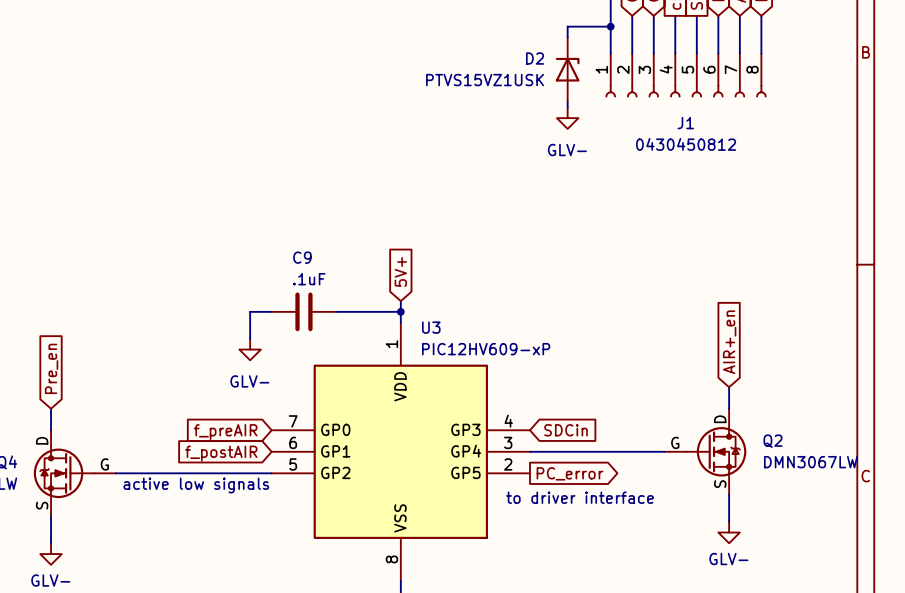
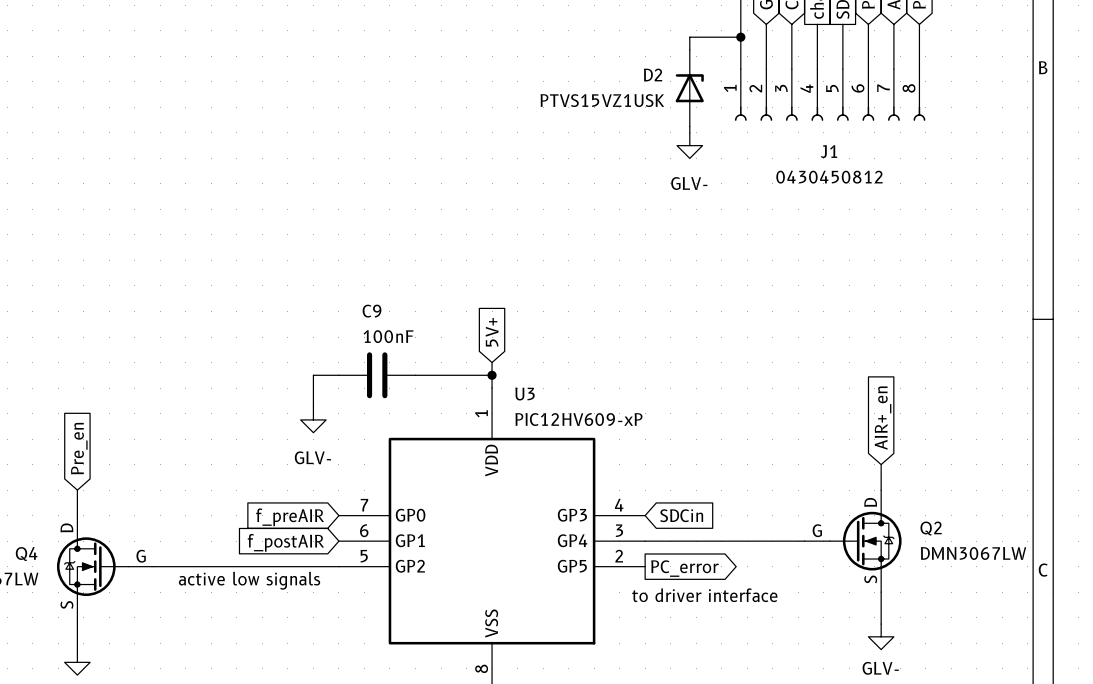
C9 value: .1uF (309, 279) -> 100nF (388, 336)

